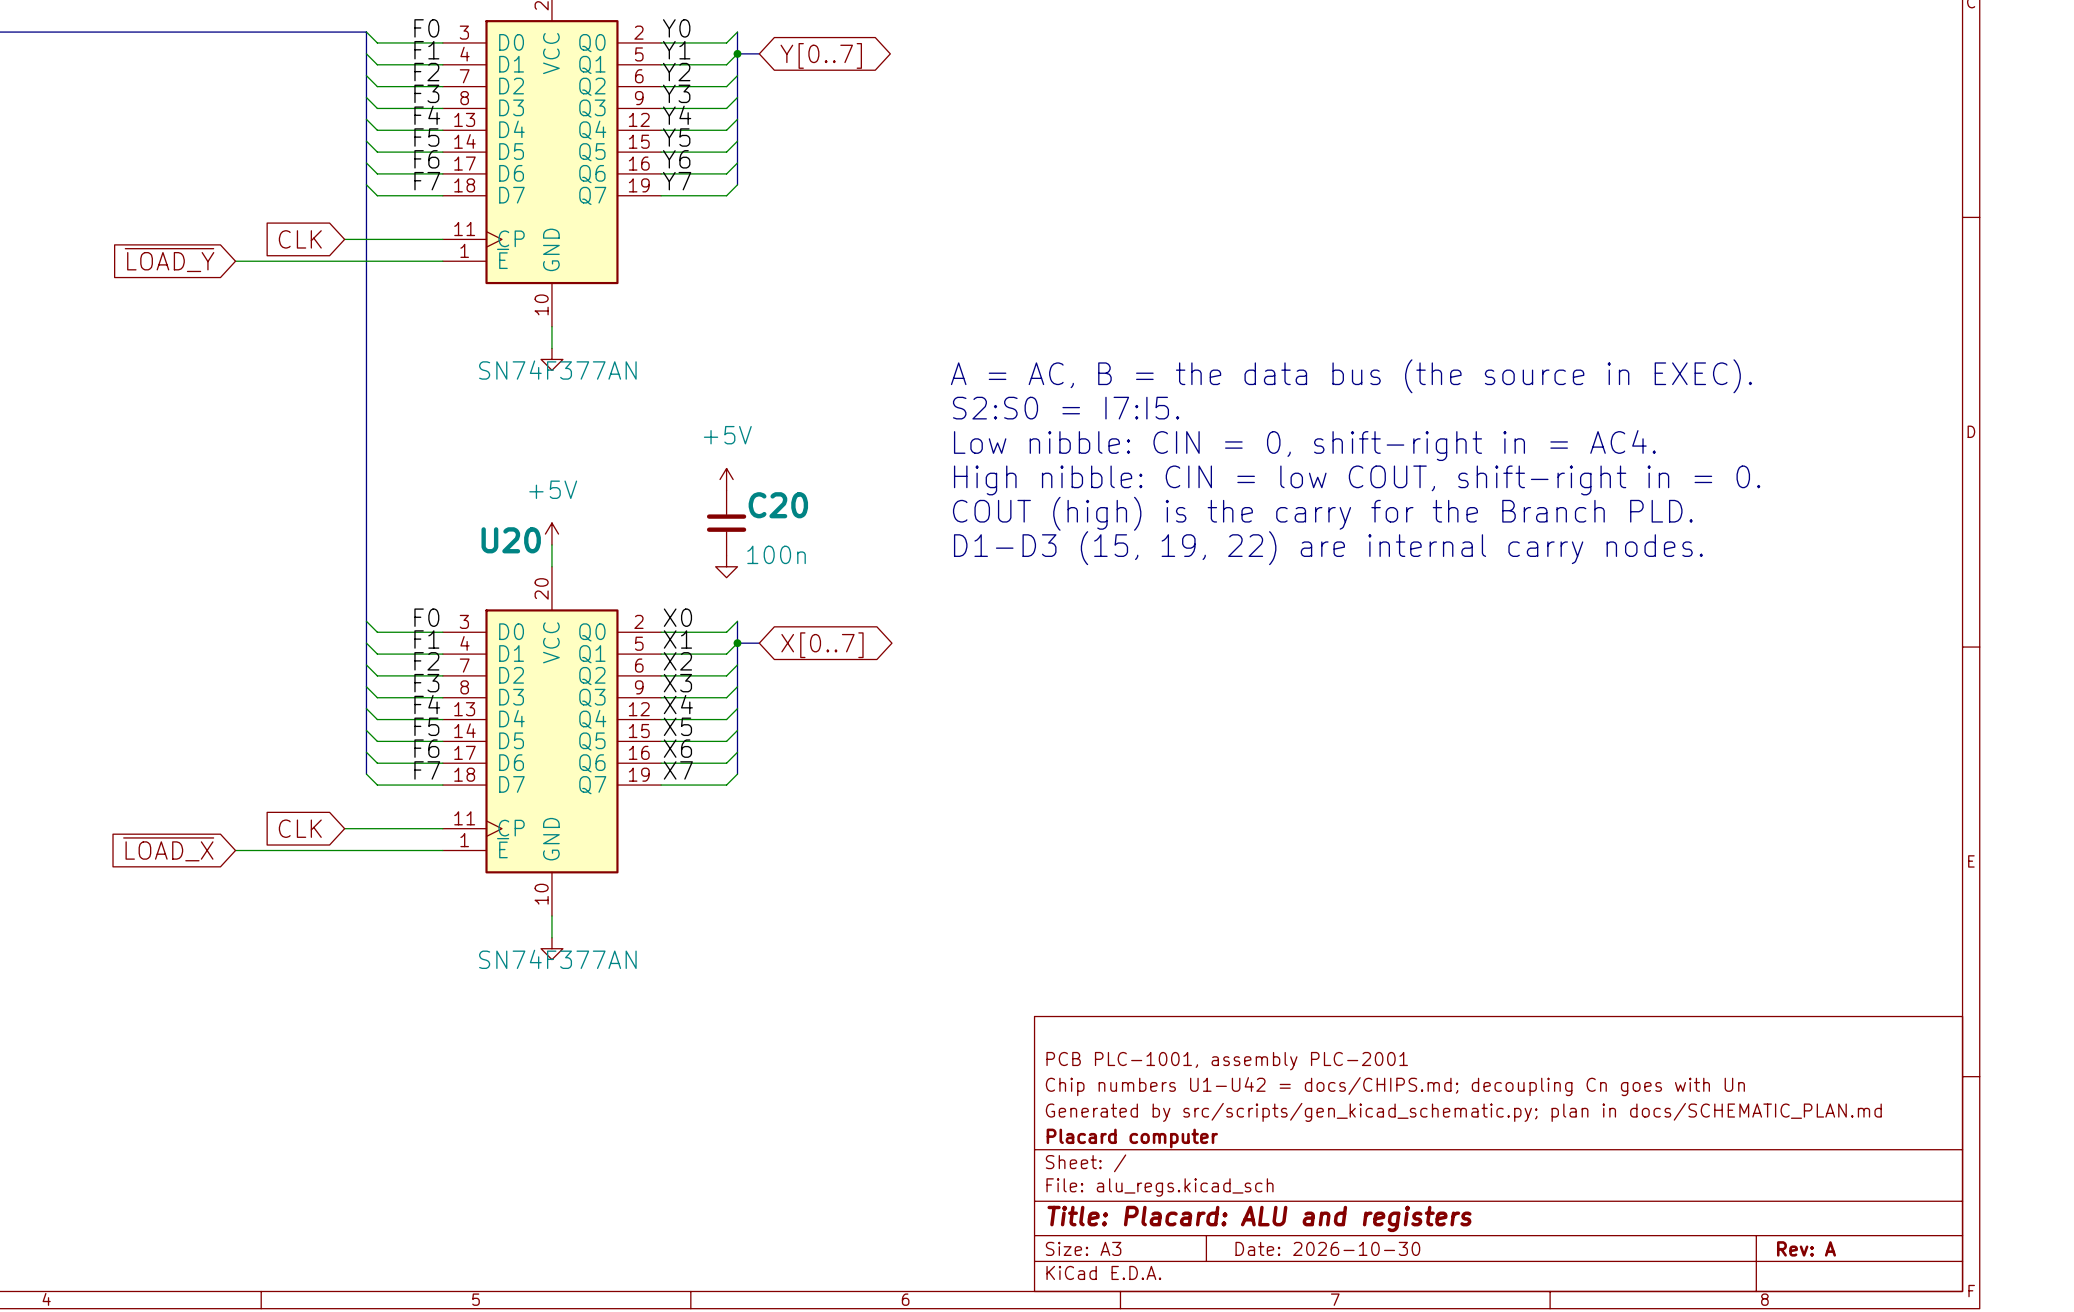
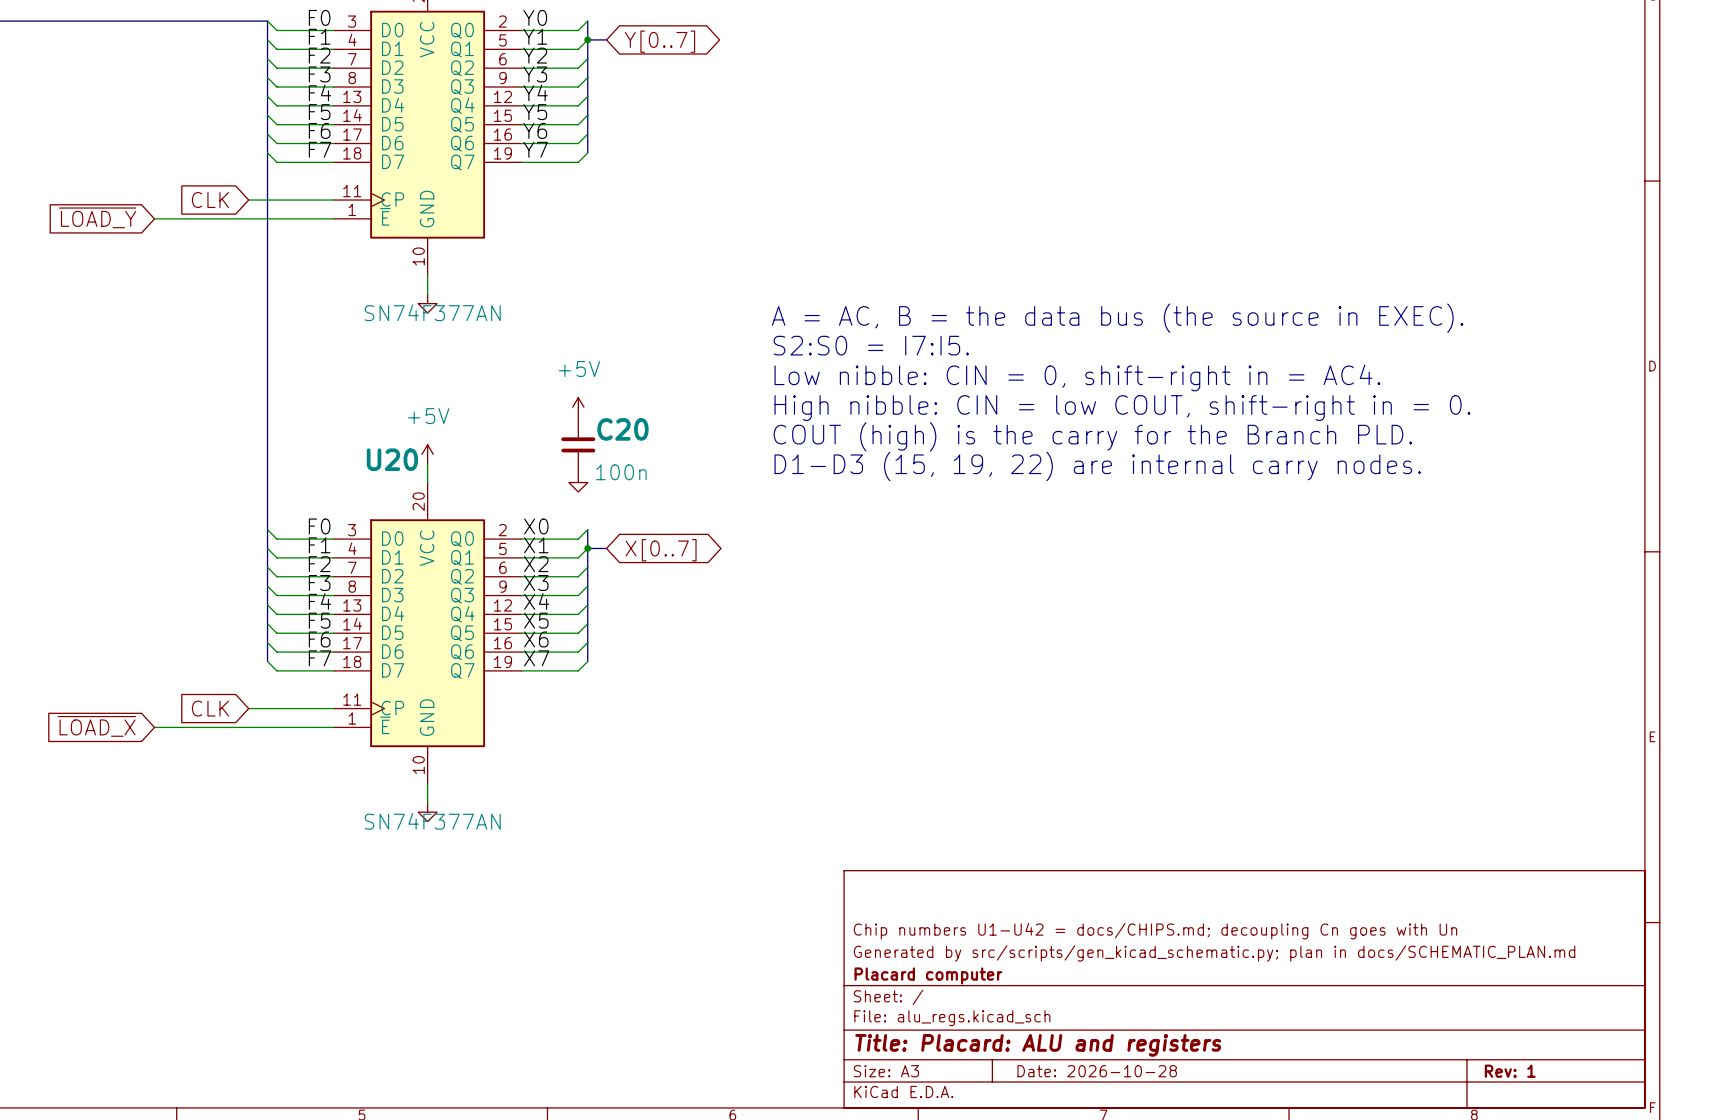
title block: PCB PLC-1001, assembly PLC-2001 (1227, 1061) -> none
title block: Date: 2026-10-30 (1327, 1248) -> Date: 2026-10-28 (1097, 1071)
title block: Rev: A (1806, 1248) -> Rev: 1 (1510, 1071)

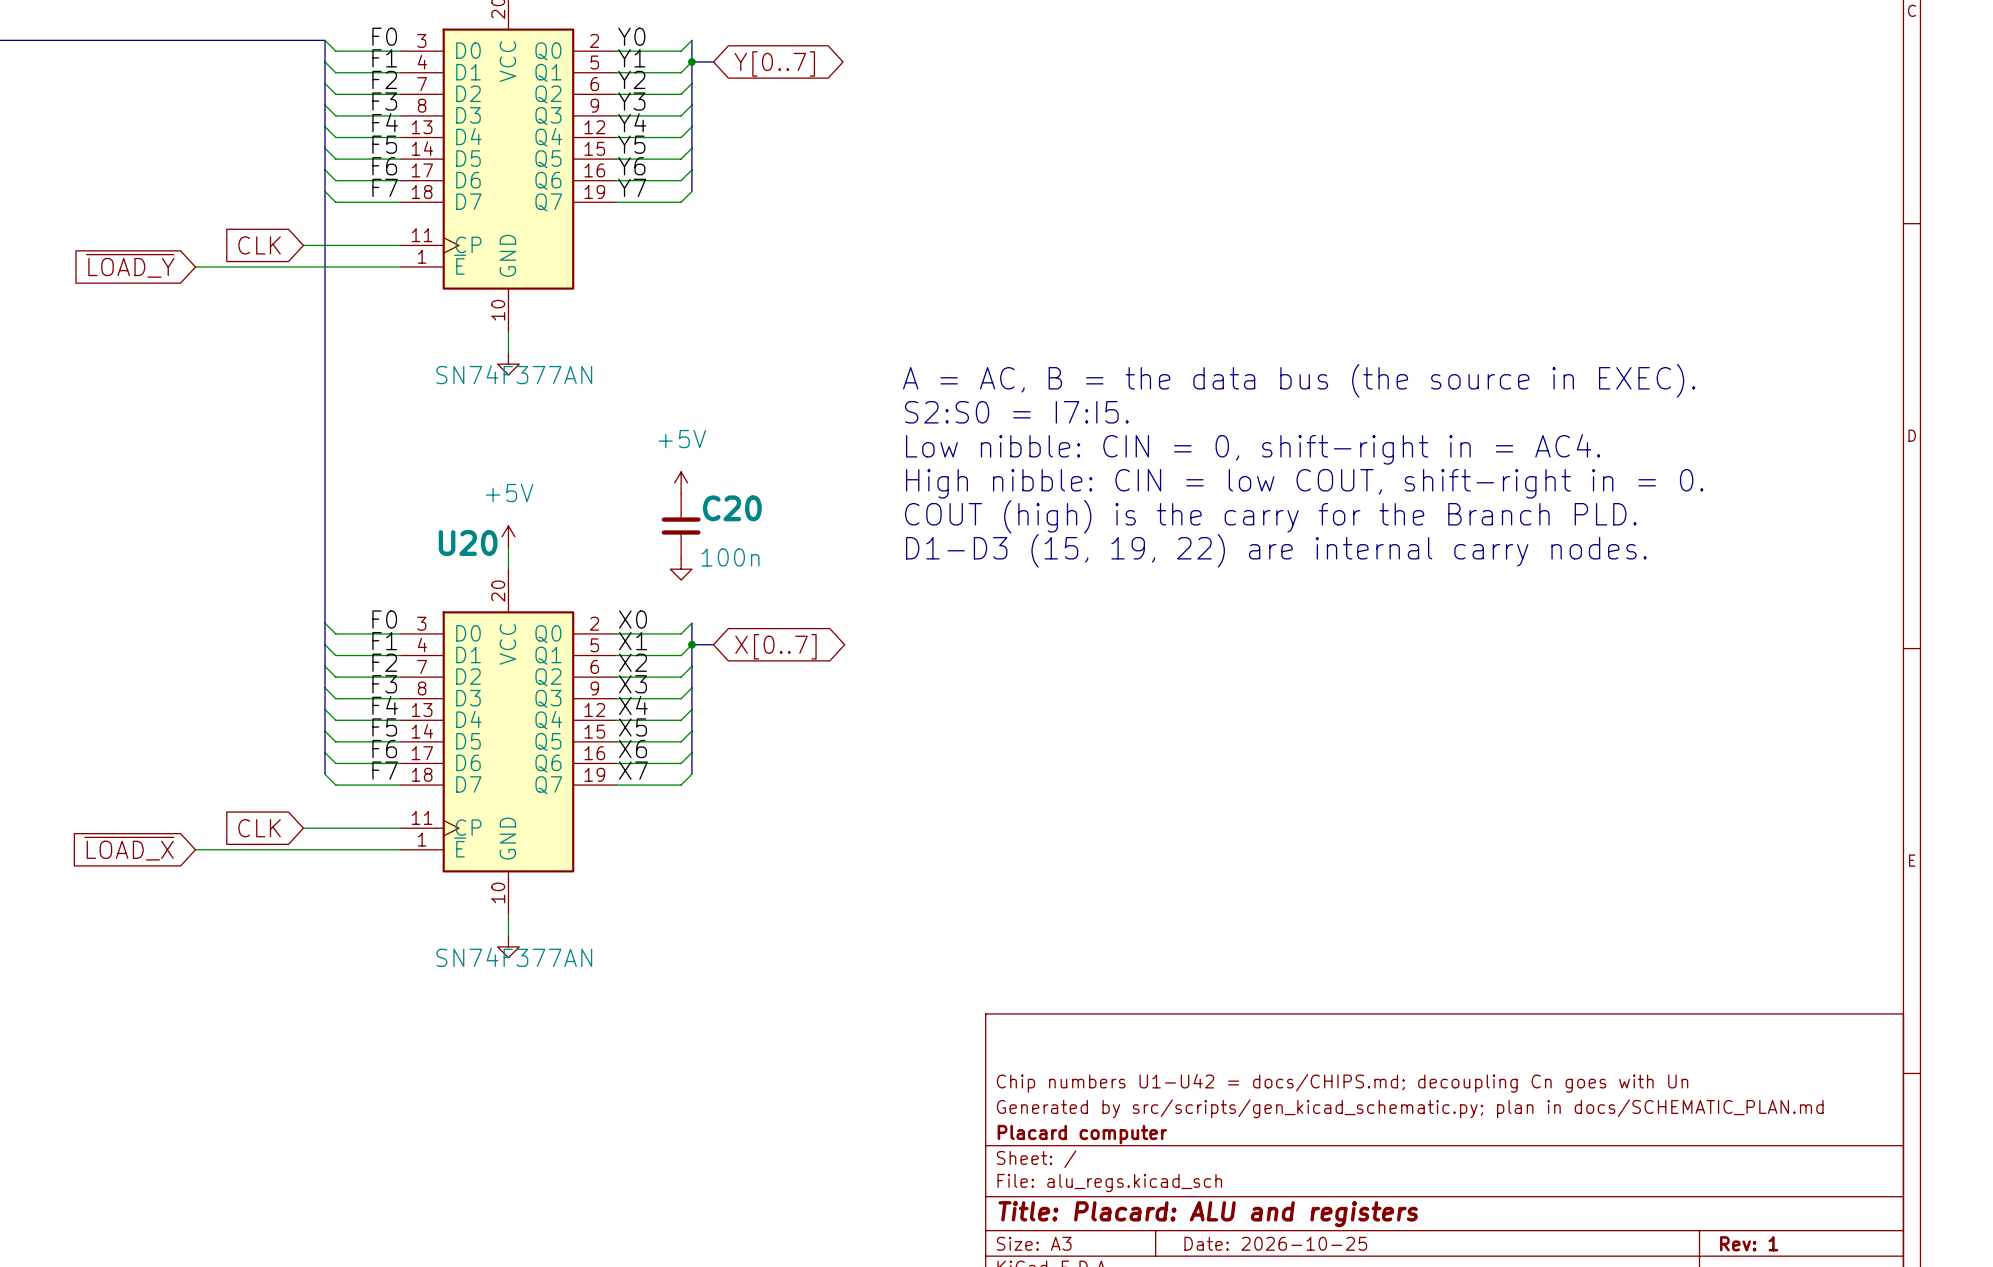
title block: Date: 2026-10-28 (1097, 1071) -> Date: 2026-10-25 (1275, 1243)

